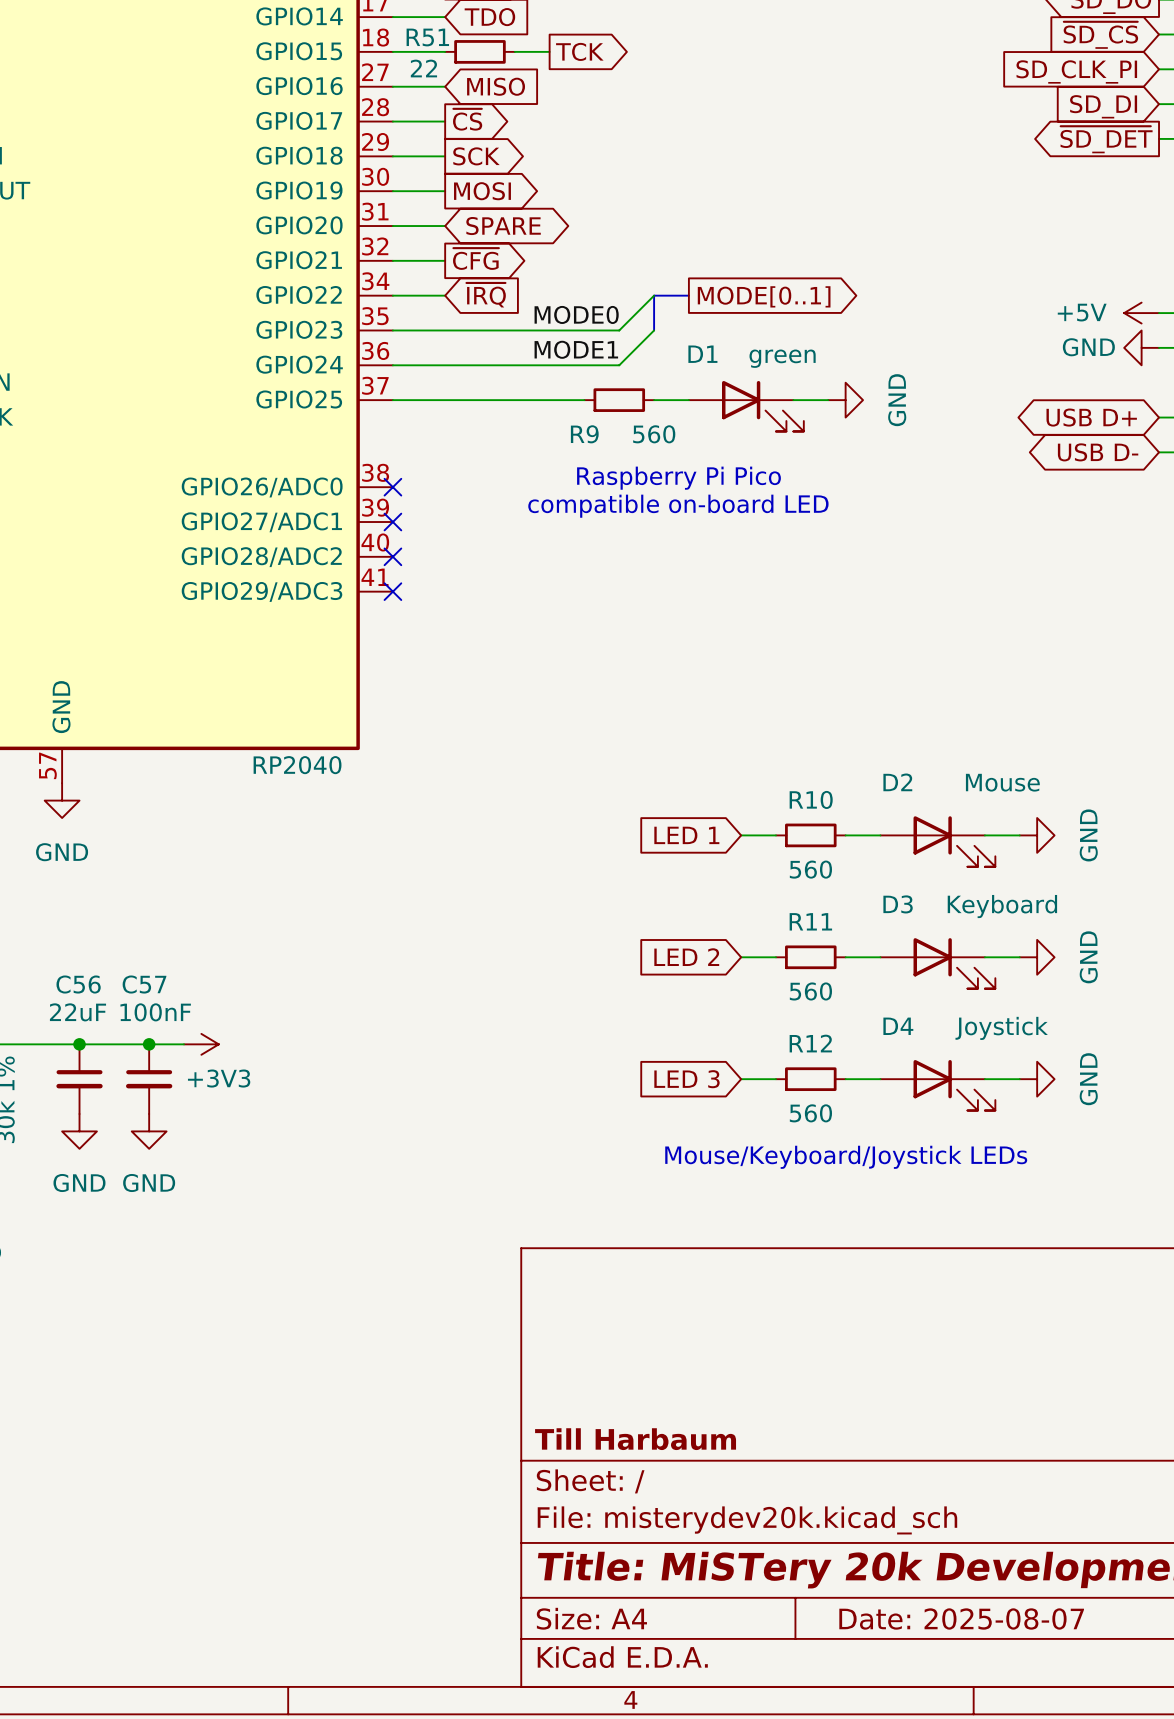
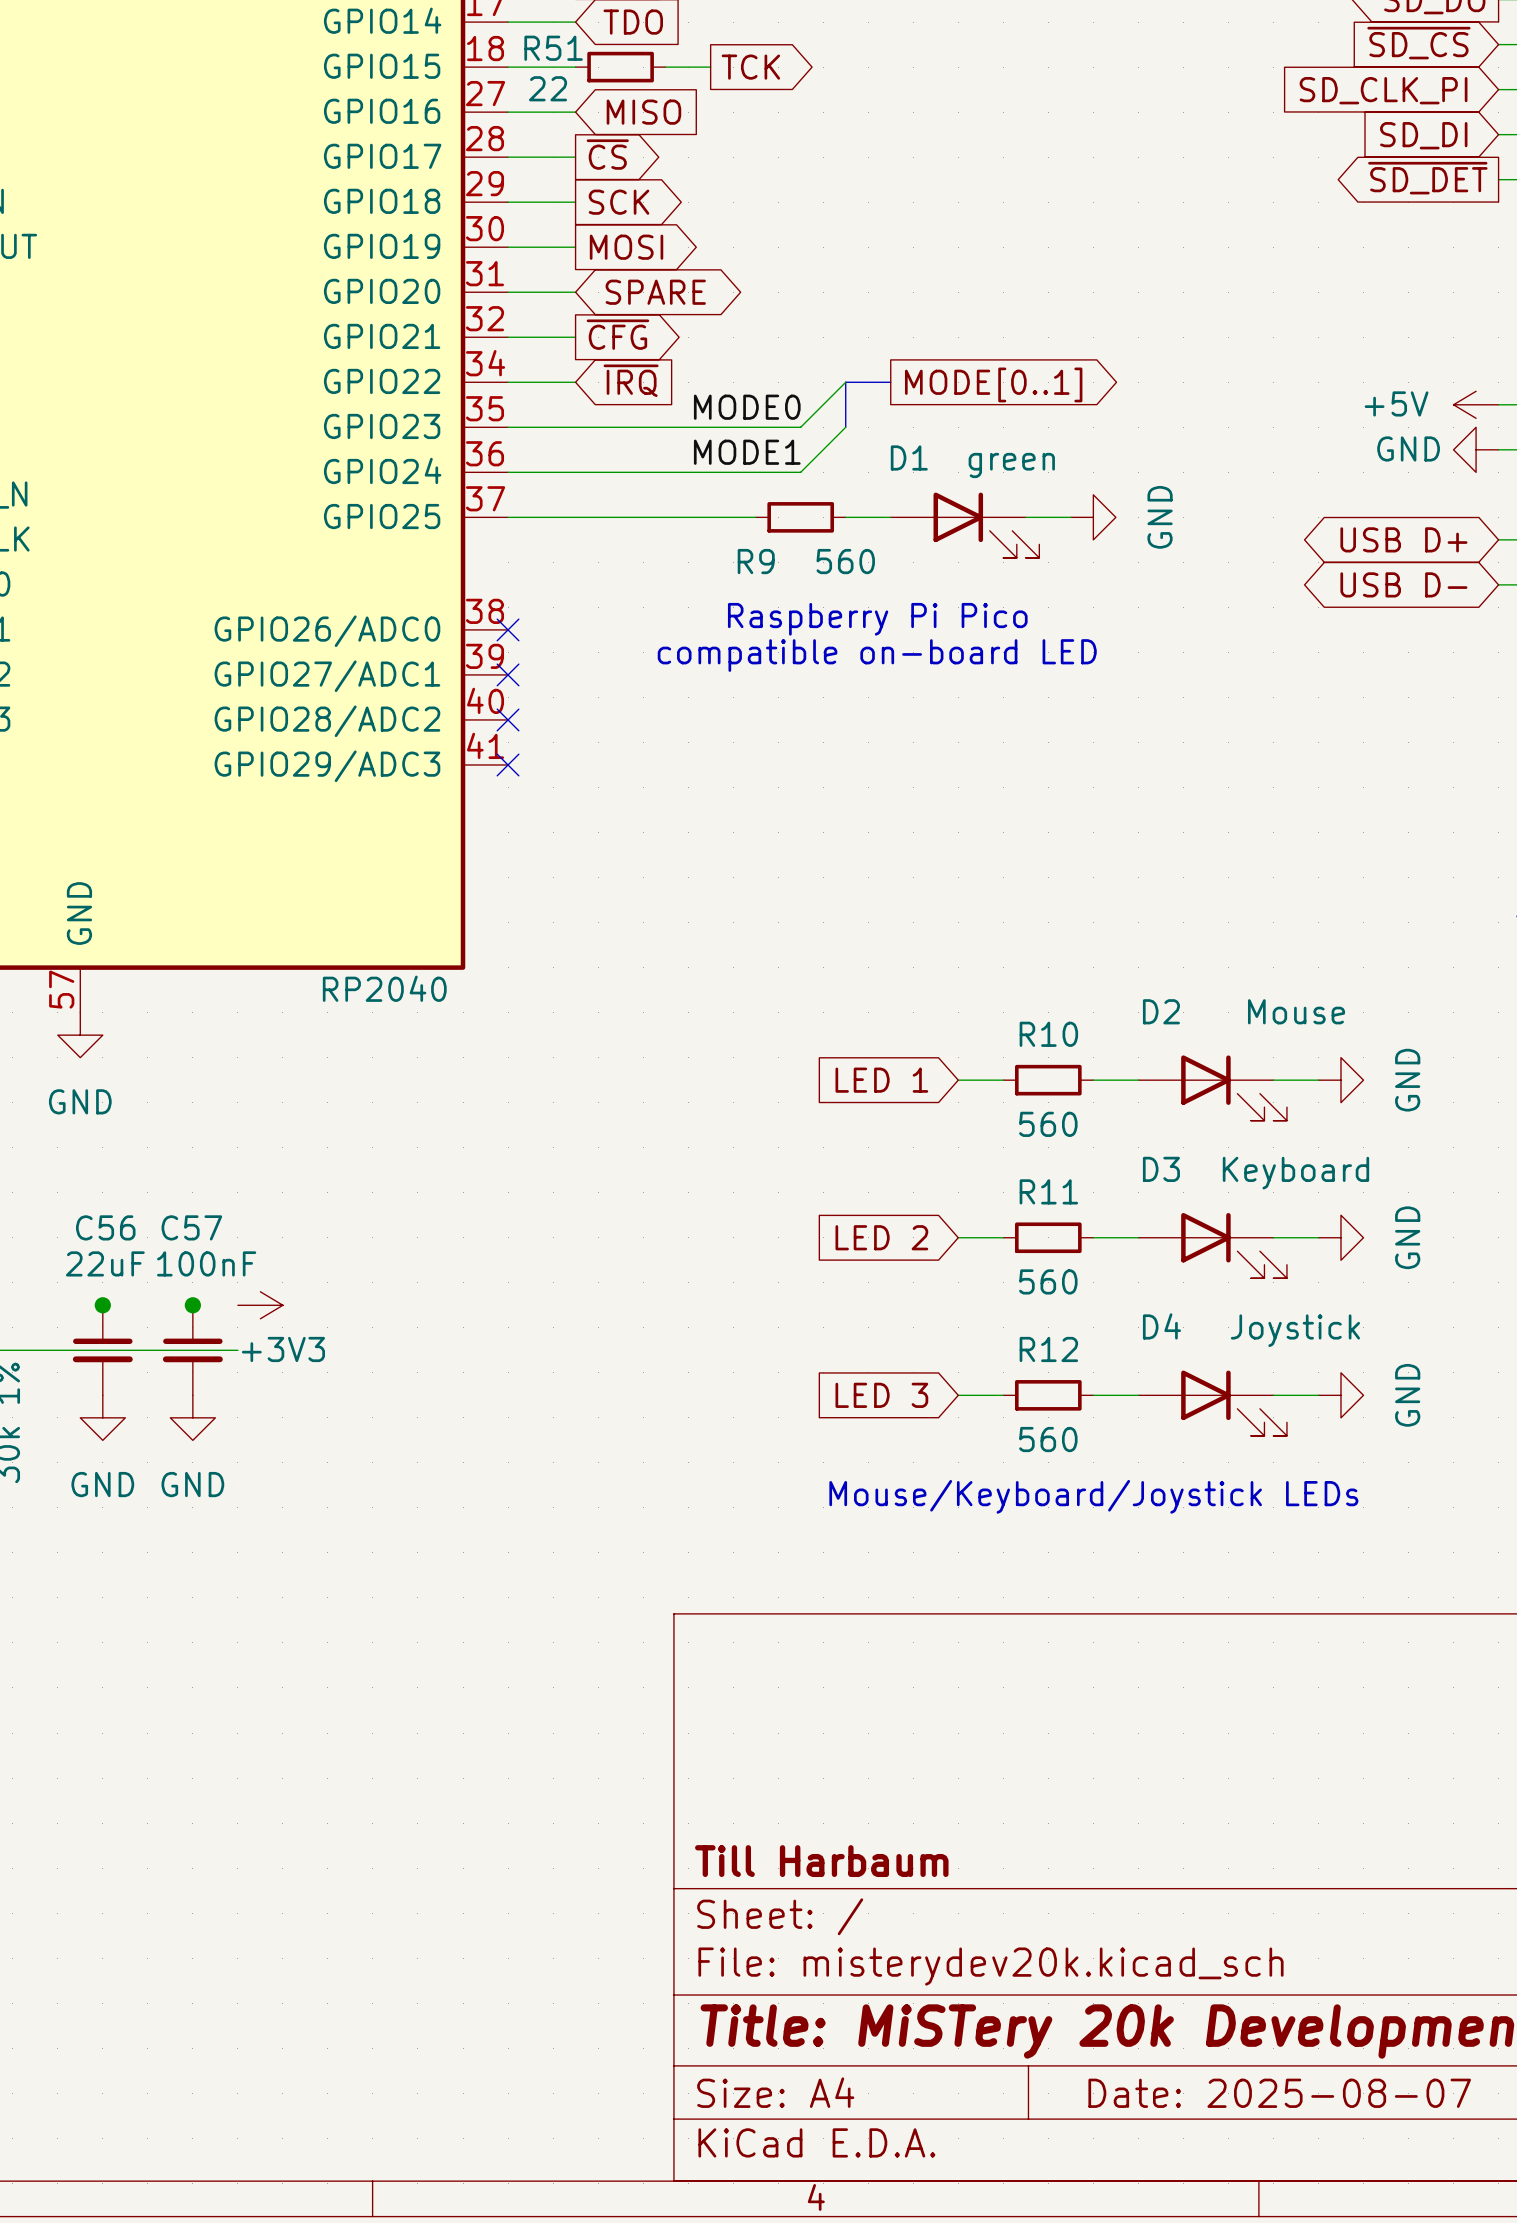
junction position: (79, 1044) -> (102, 1305)
junction position: (149, 1044) -> (192, 1305)
power symbol position: +3V3 (201, 1044) -> +3V3 (260, 1305)
C56 position: (79, 1079) -> (102, 1350)
C57 position: (149, 1079) -> (192, 1350)
power symbol position: GND (79, 1131) -> GND (102, 1417)
power symbol position: GND (149, 1131) -> GND (192, 1417)

